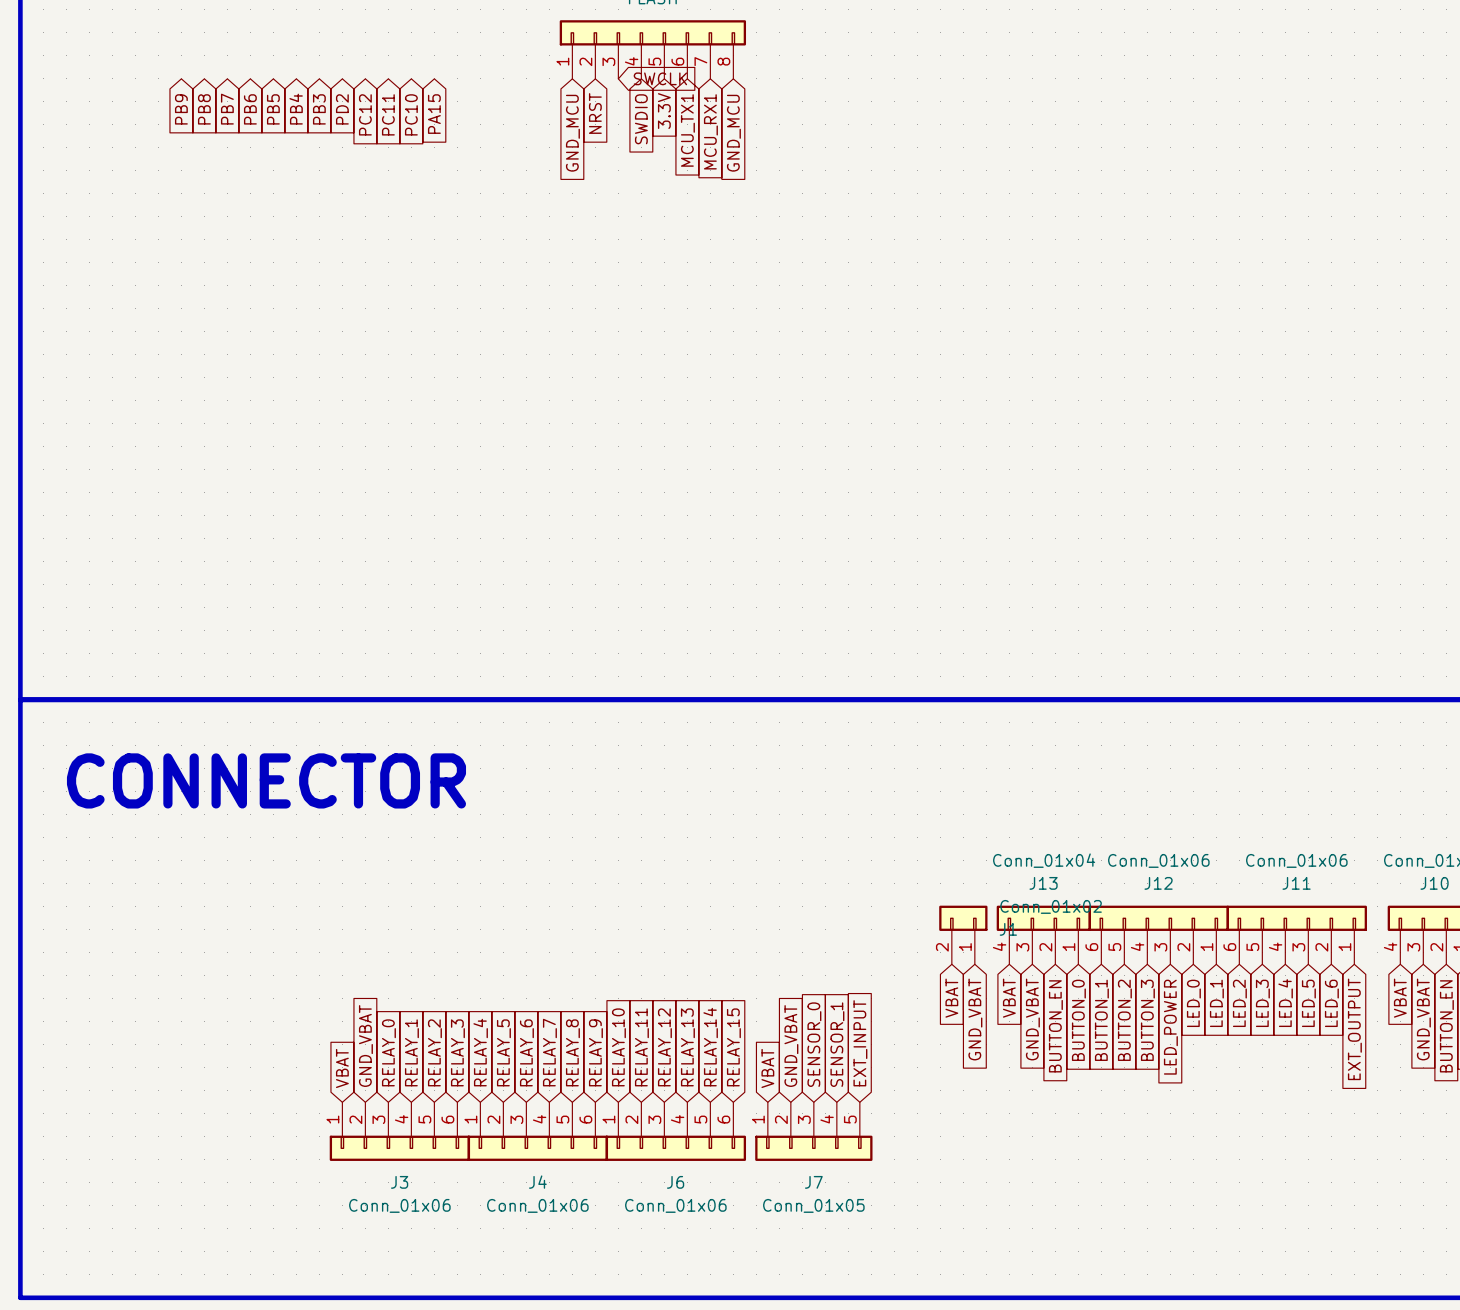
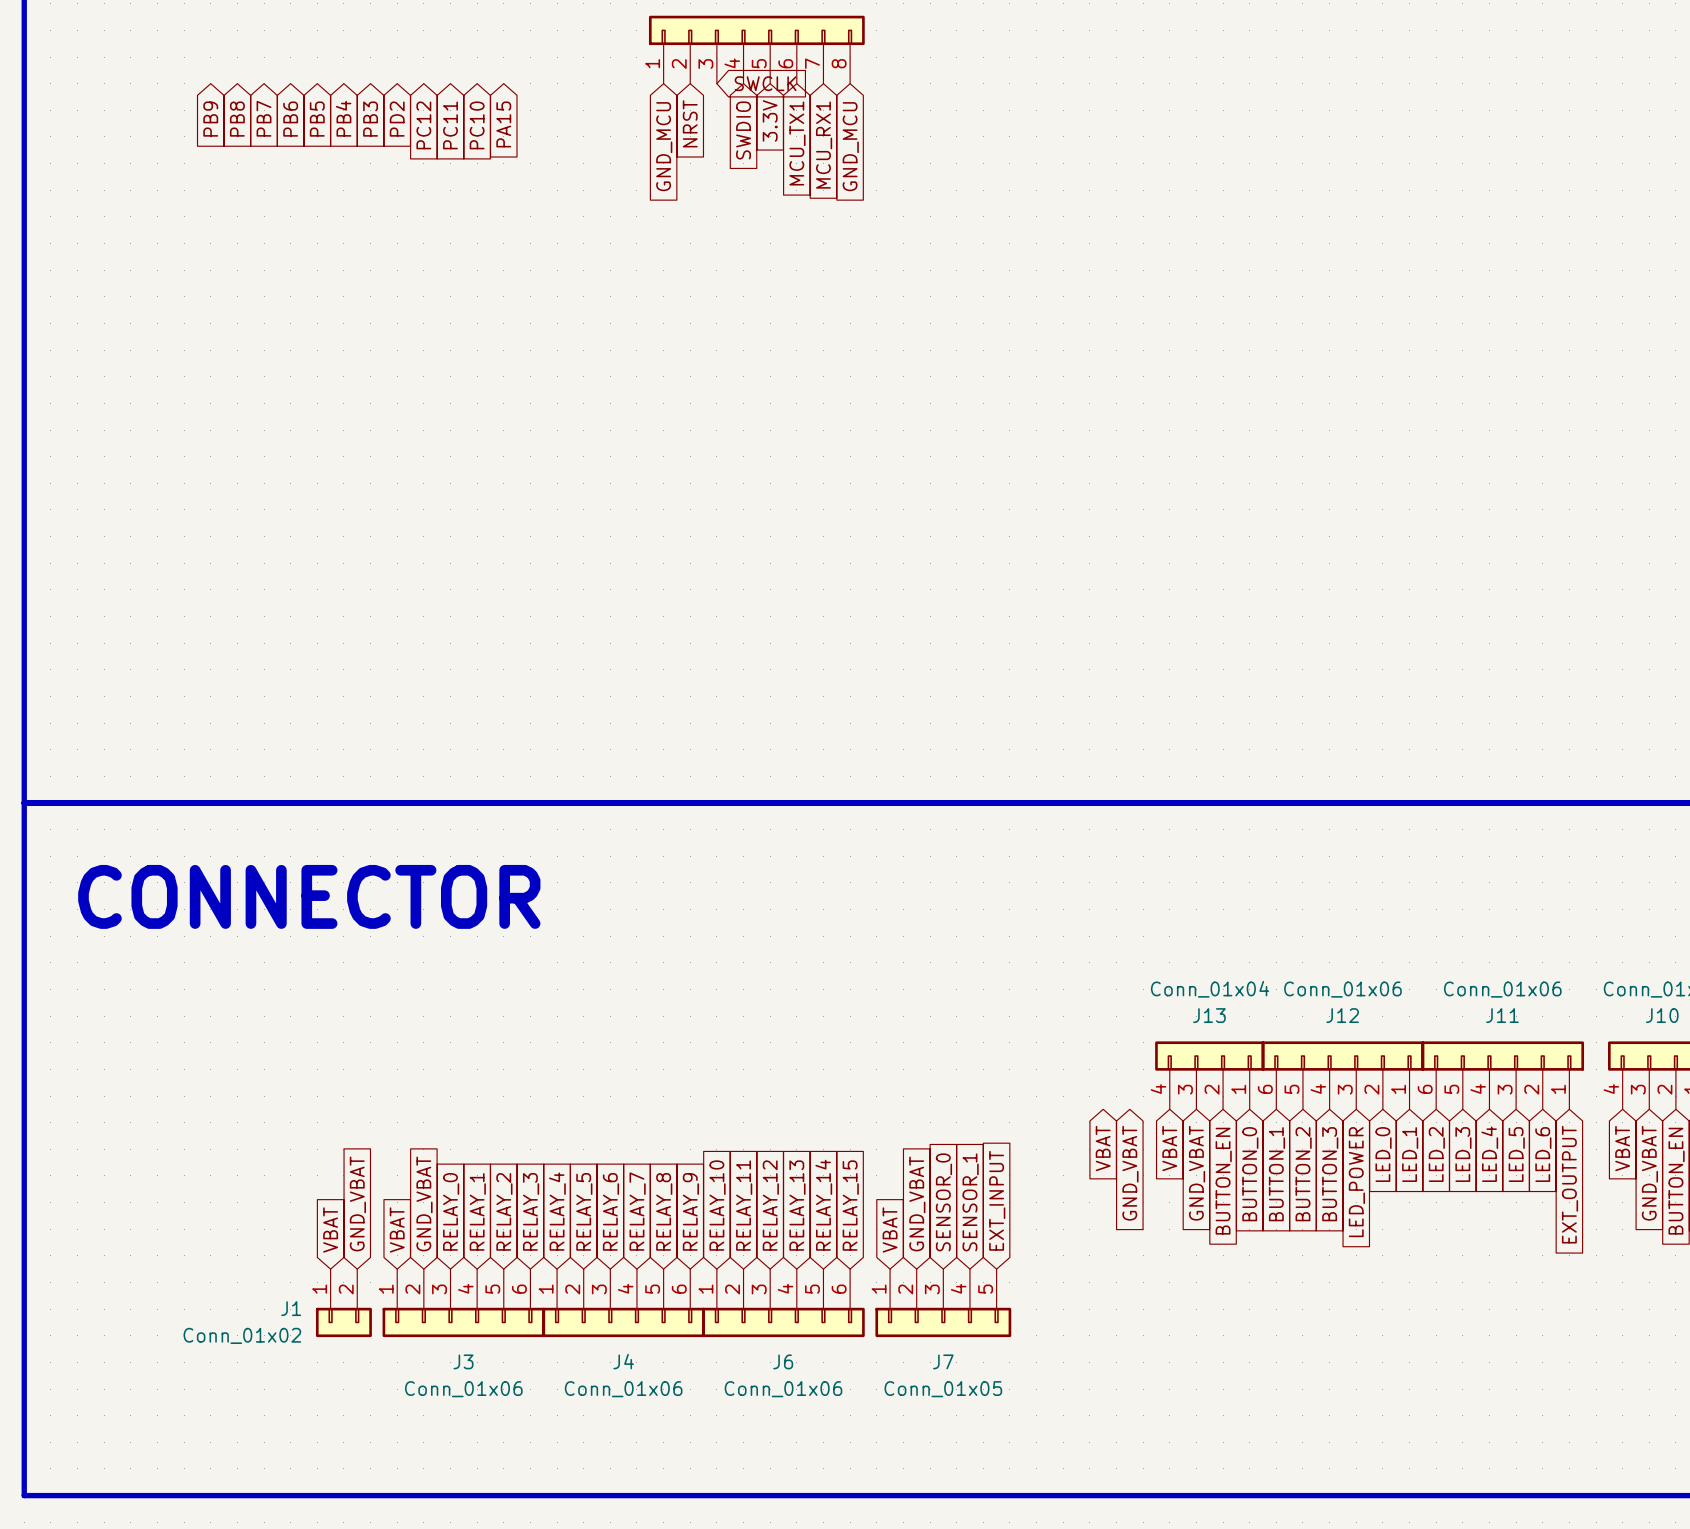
J1 rotation: 0° (963, 918) -> 180° (343, 1322)
J1 position: (963, 934) -> (343, 1303)
global label: none -> GND_VBAT (357, 1203)
global label: none -> VBAT (330, 1229)

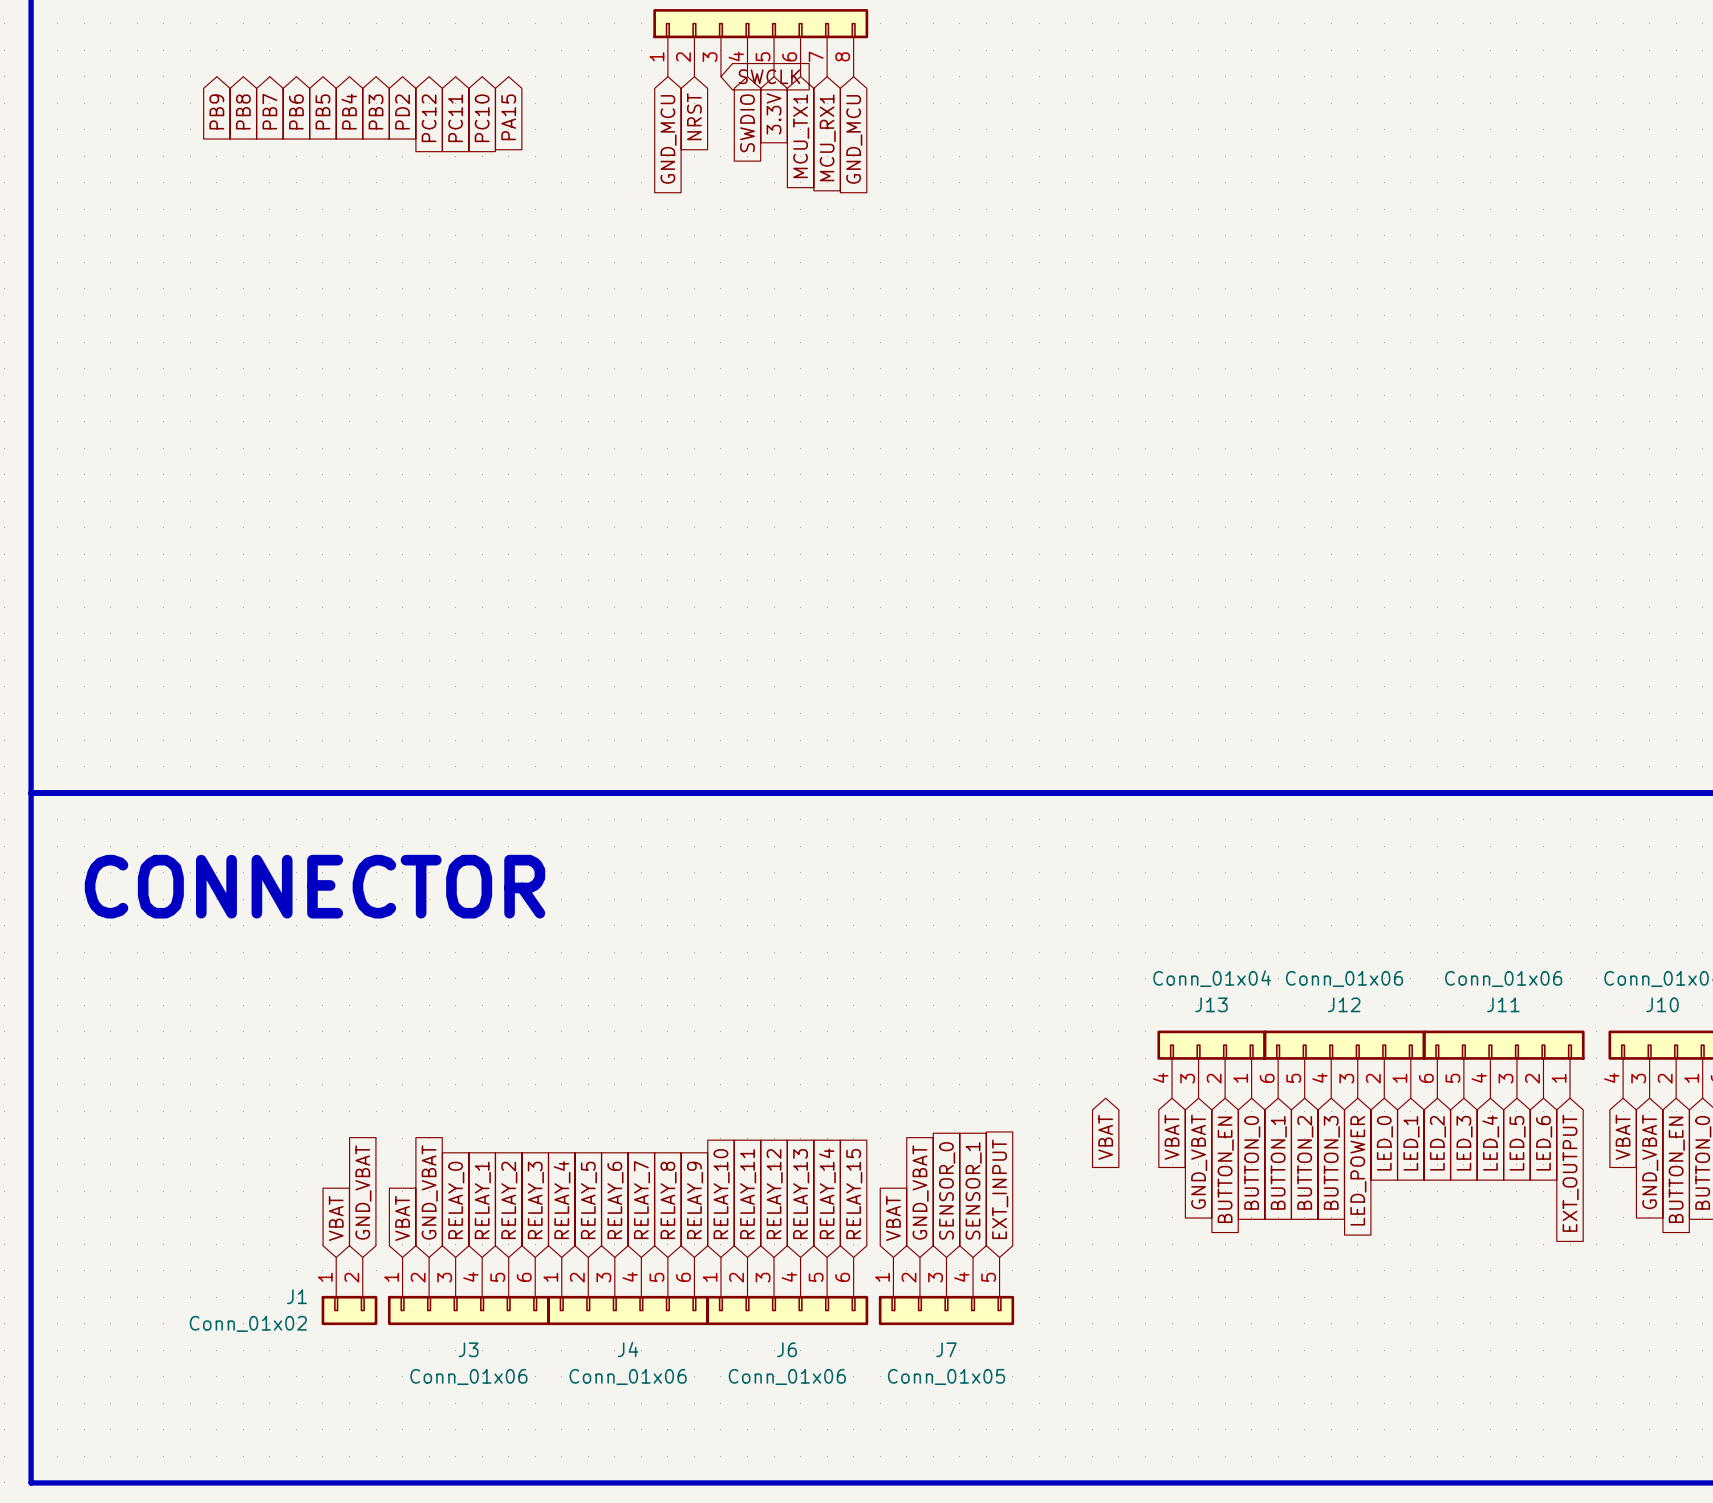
global label: GND_VBAT (1130, 1173) -> none

